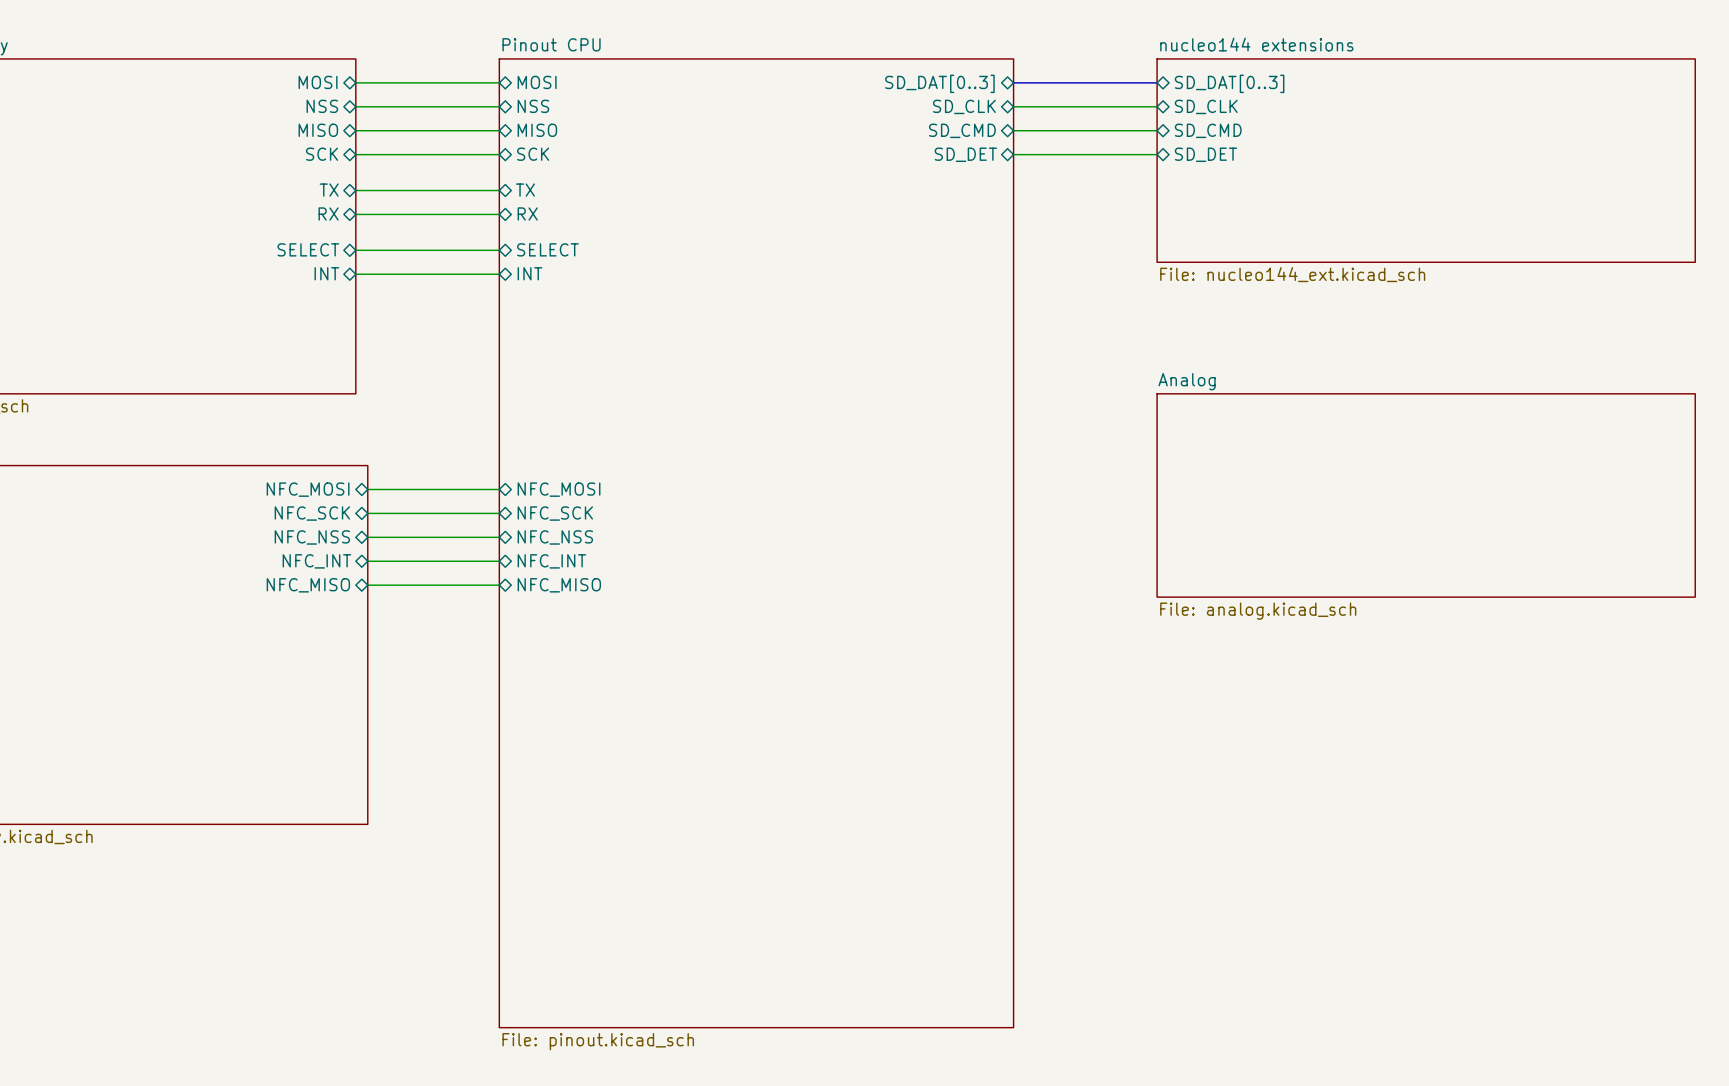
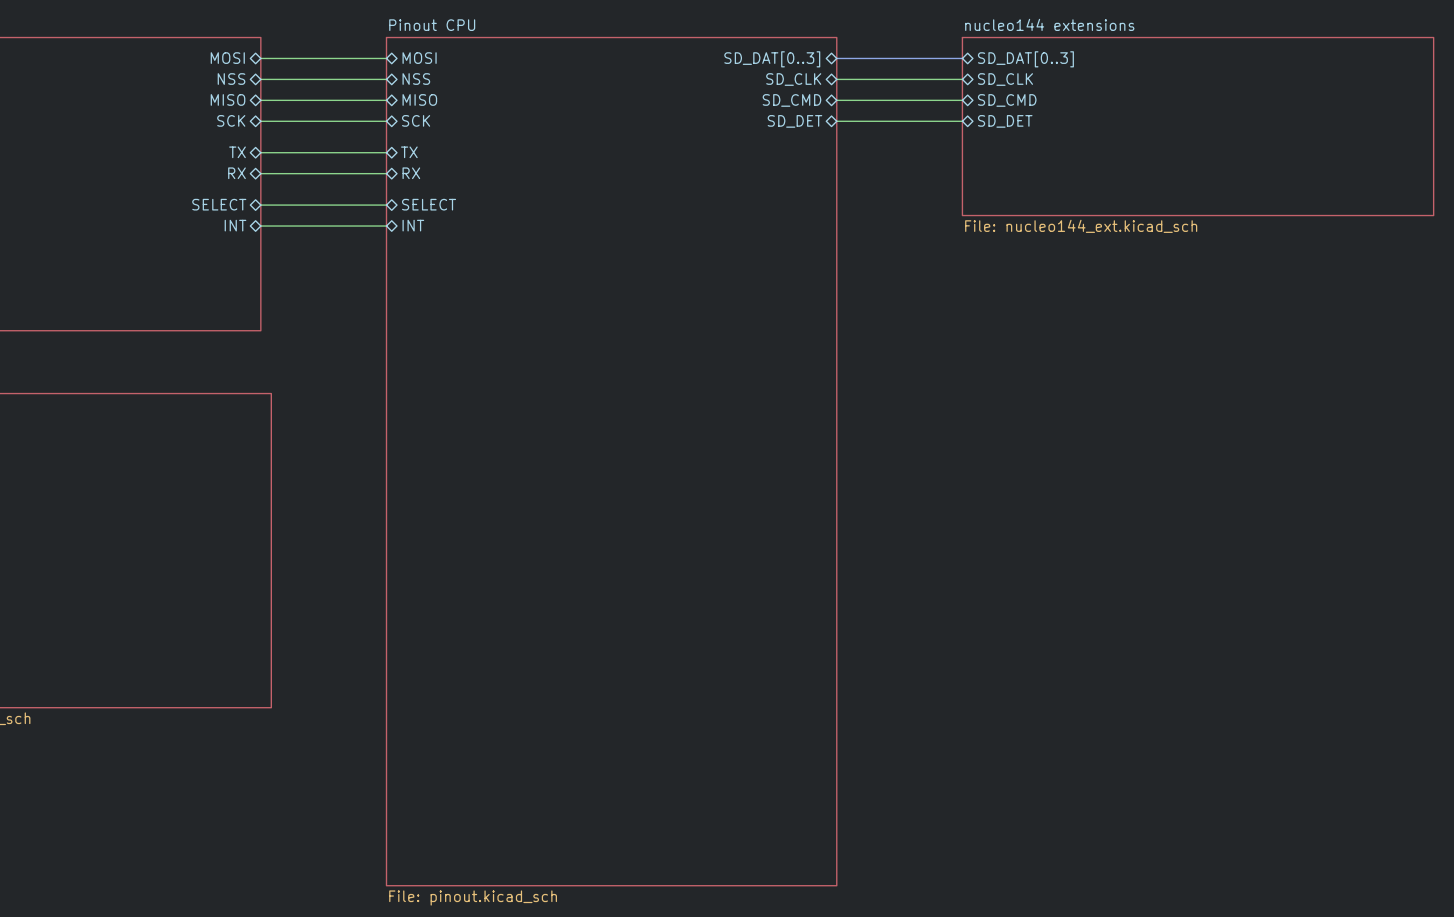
sheet pin: NFC_MOSI (308, 489) -> none
wire: (367, 489) (499, 489) -> none
sheet pin: NFC_MOSI (559, 489) -> none
sheet Analog: File: analog.kicad_sch (1426, 495) -> none
sheet pin: NFC_SCK (312, 513) -> none
wire: (367, 513) (499, 513) -> none
sheet pin: NFC_SCK (555, 513) -> none
sheet pin: NFC_NSS (312, 537) -> none
wire: (367, 537) (499, 537) -> none
sheet pin: NFC_NSS (555, 537) -> none
sheet pin: NFC_INT (316, 561) -> none
wire: (367, 561) (499, 561) -> none
sheet pin: NFC_INT (551, 561) -> none
sheet pin: NFC_MISO (308, 585) -> none
wire: (367, 585) (499, 585) -> none
sheet pin: NFC_MISO (559, 585) -> none

